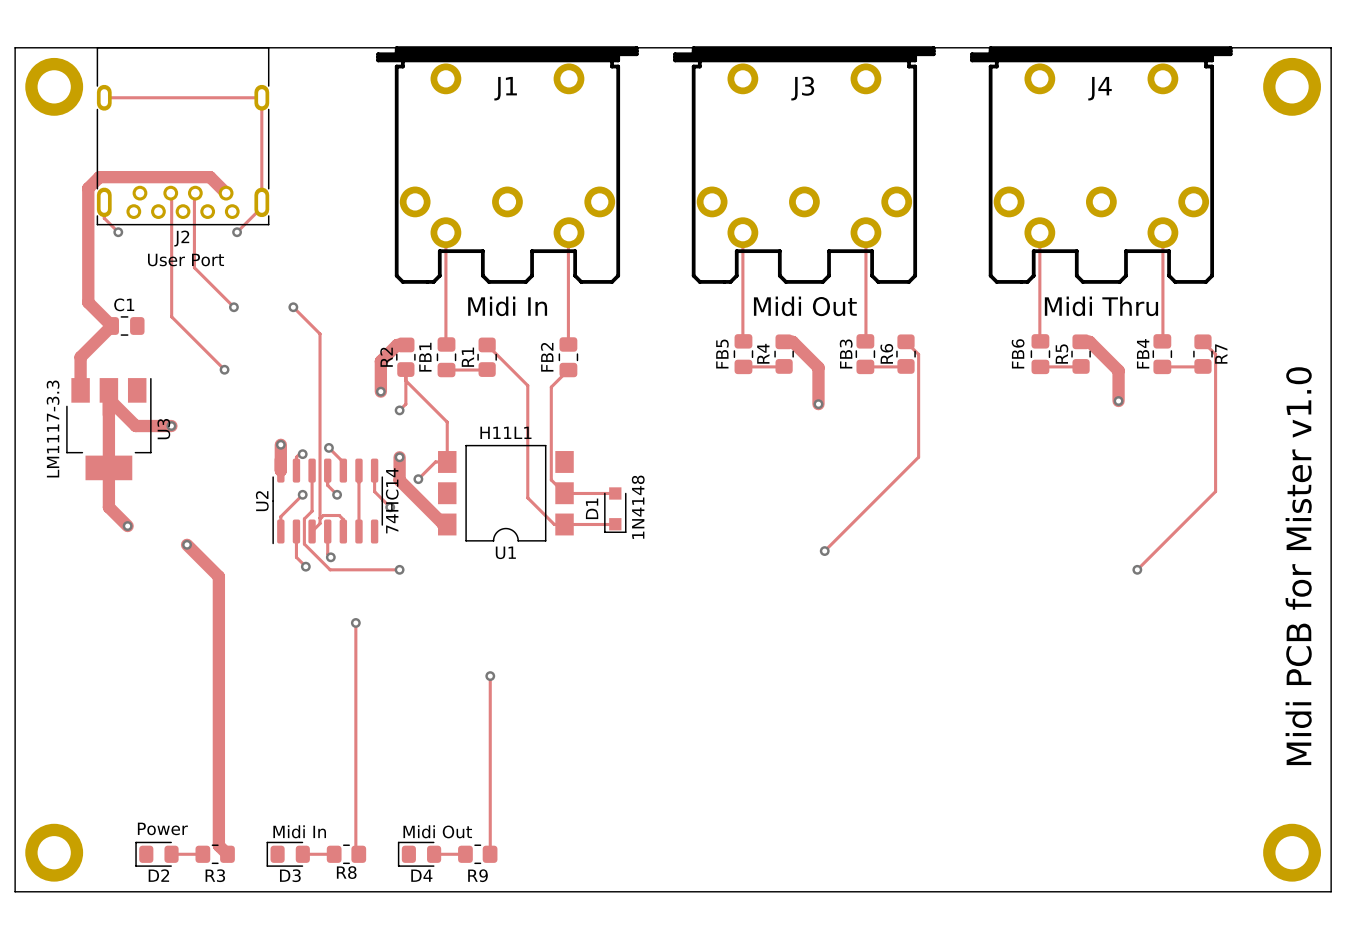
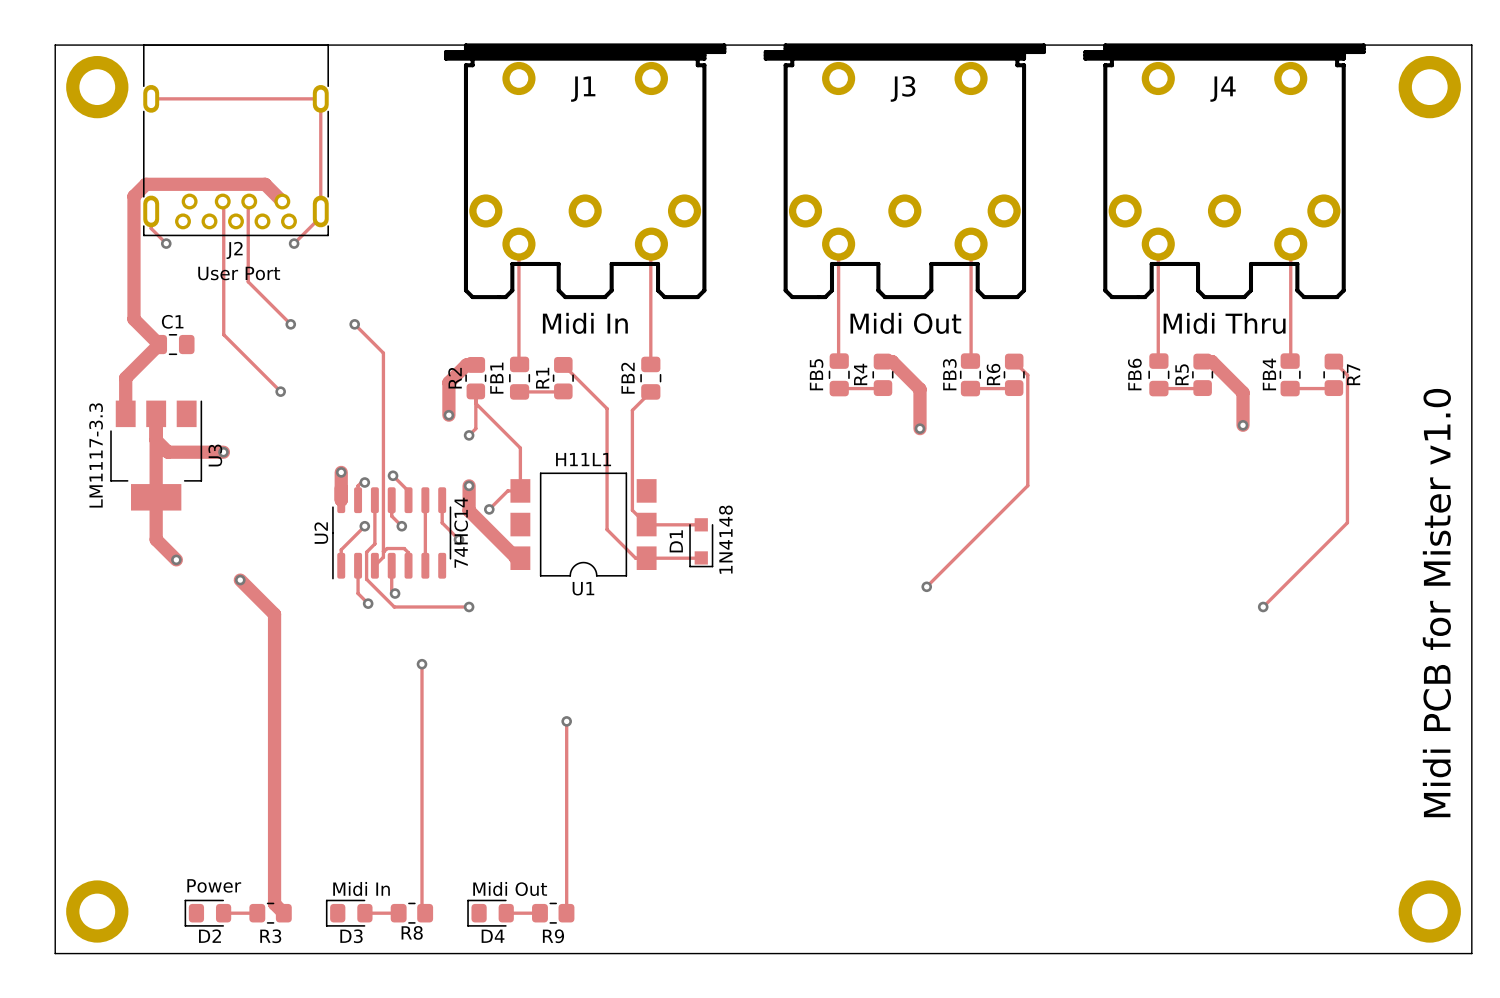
track: (108, 399) (135, 426) -> (156, 440) (168, 452) (185, 452)

